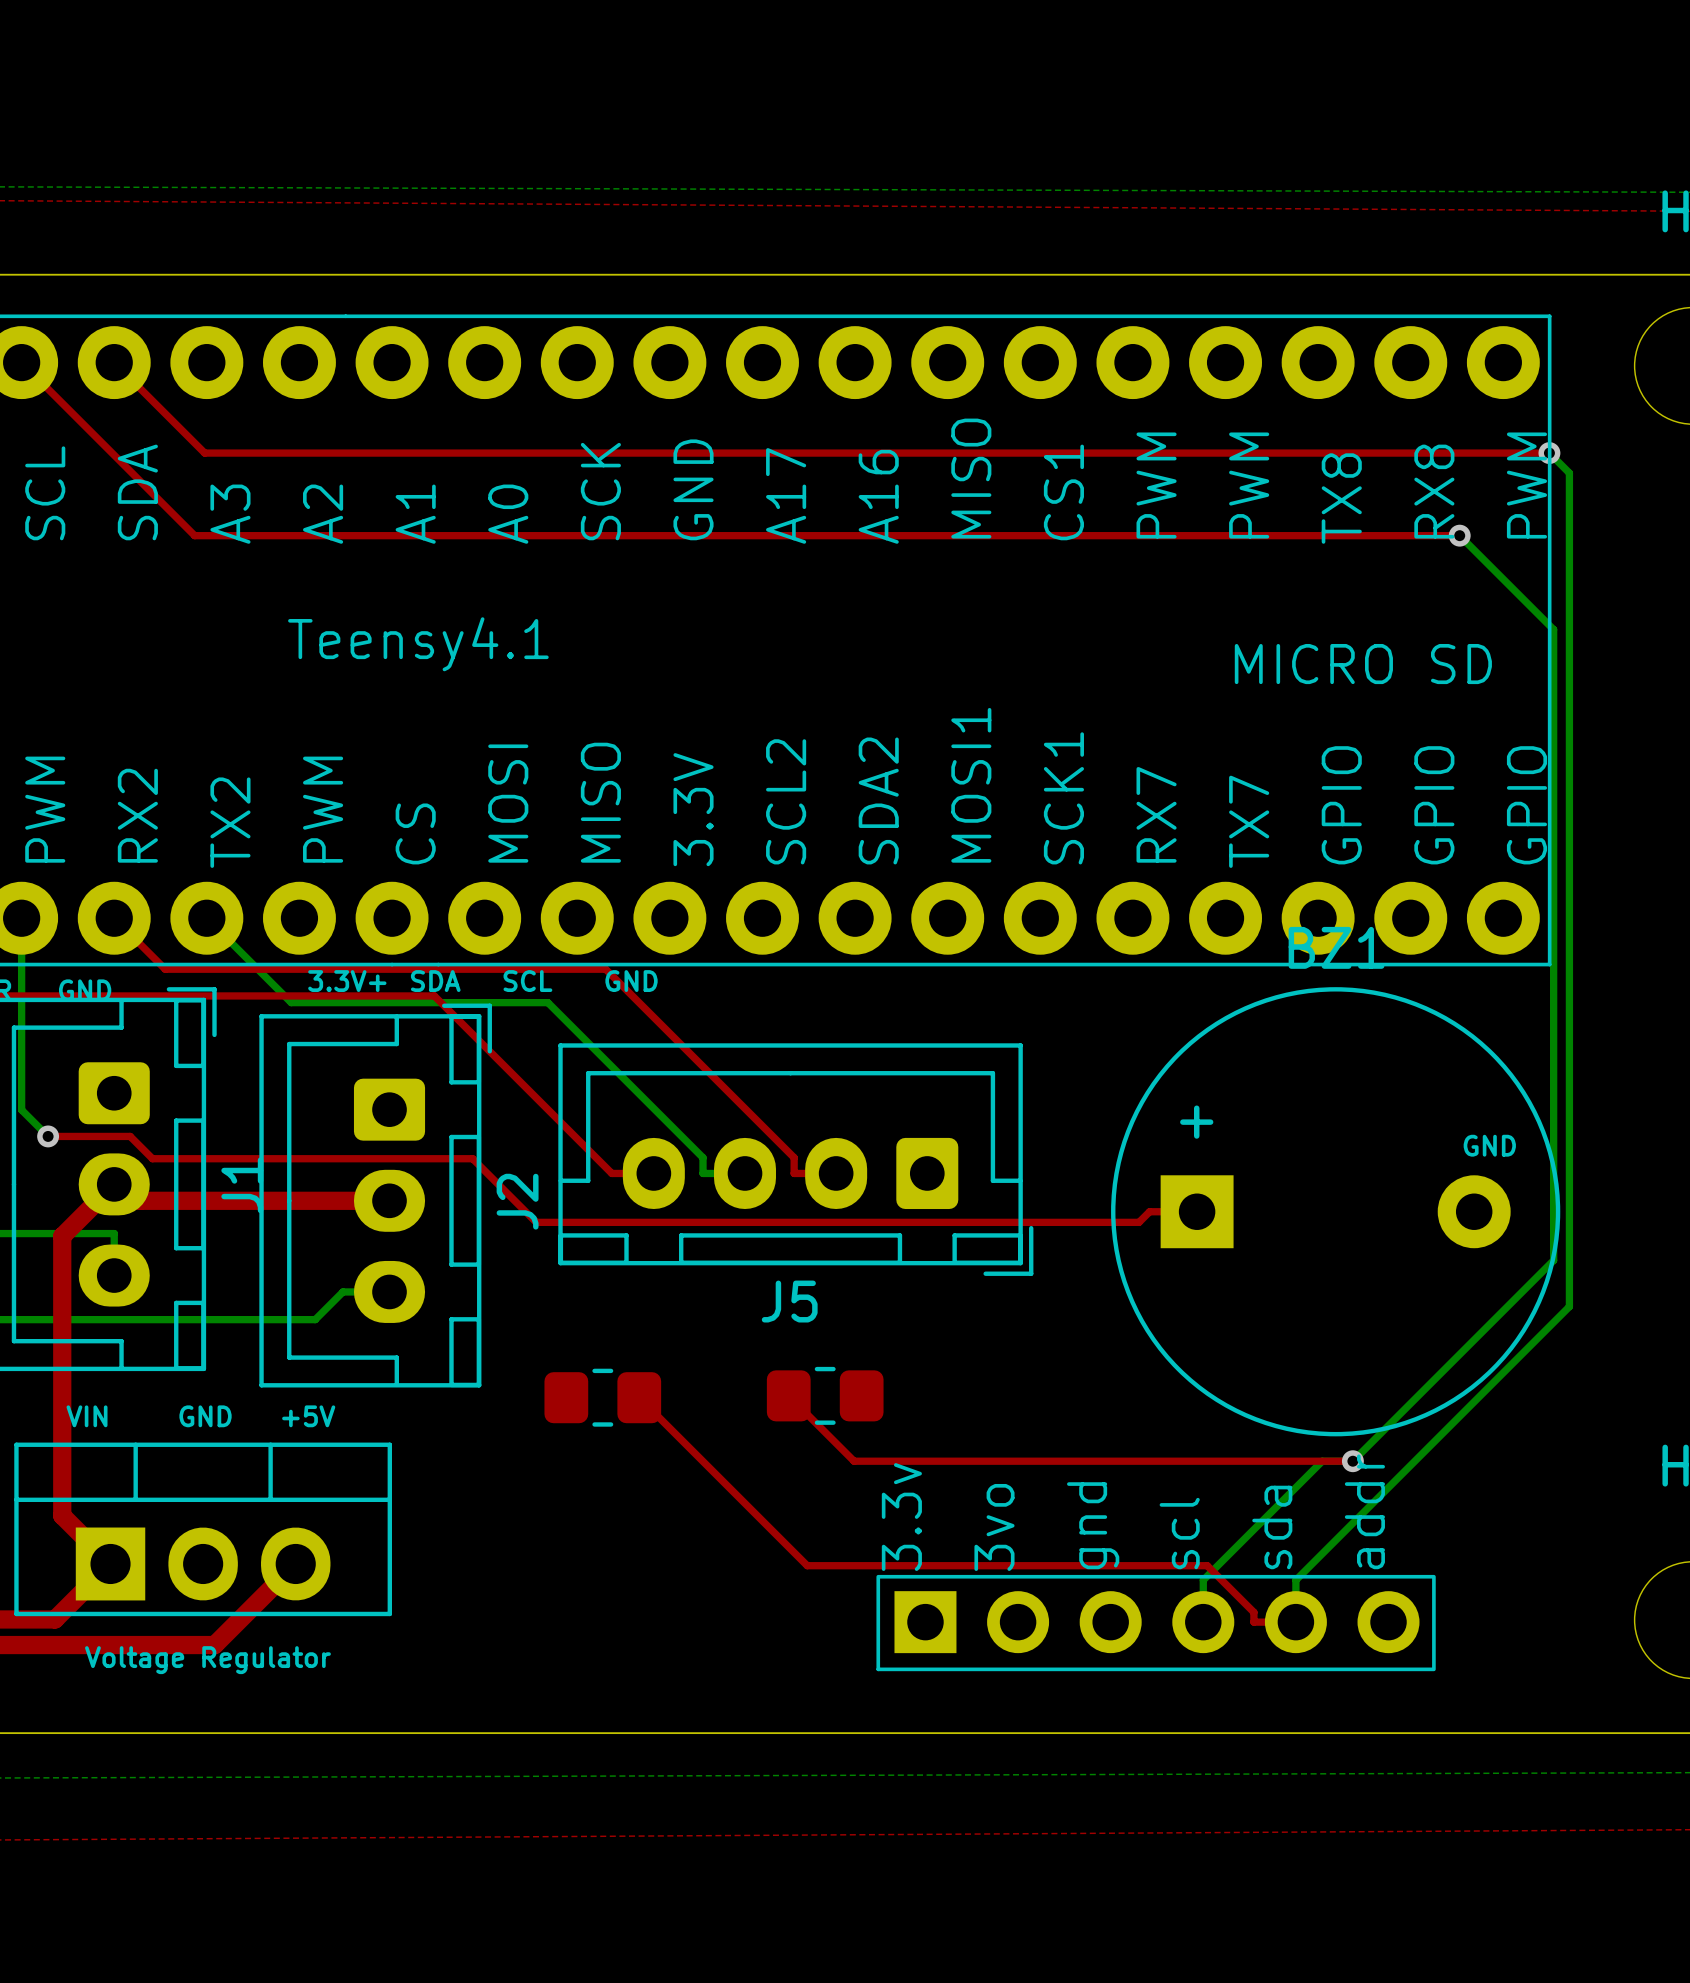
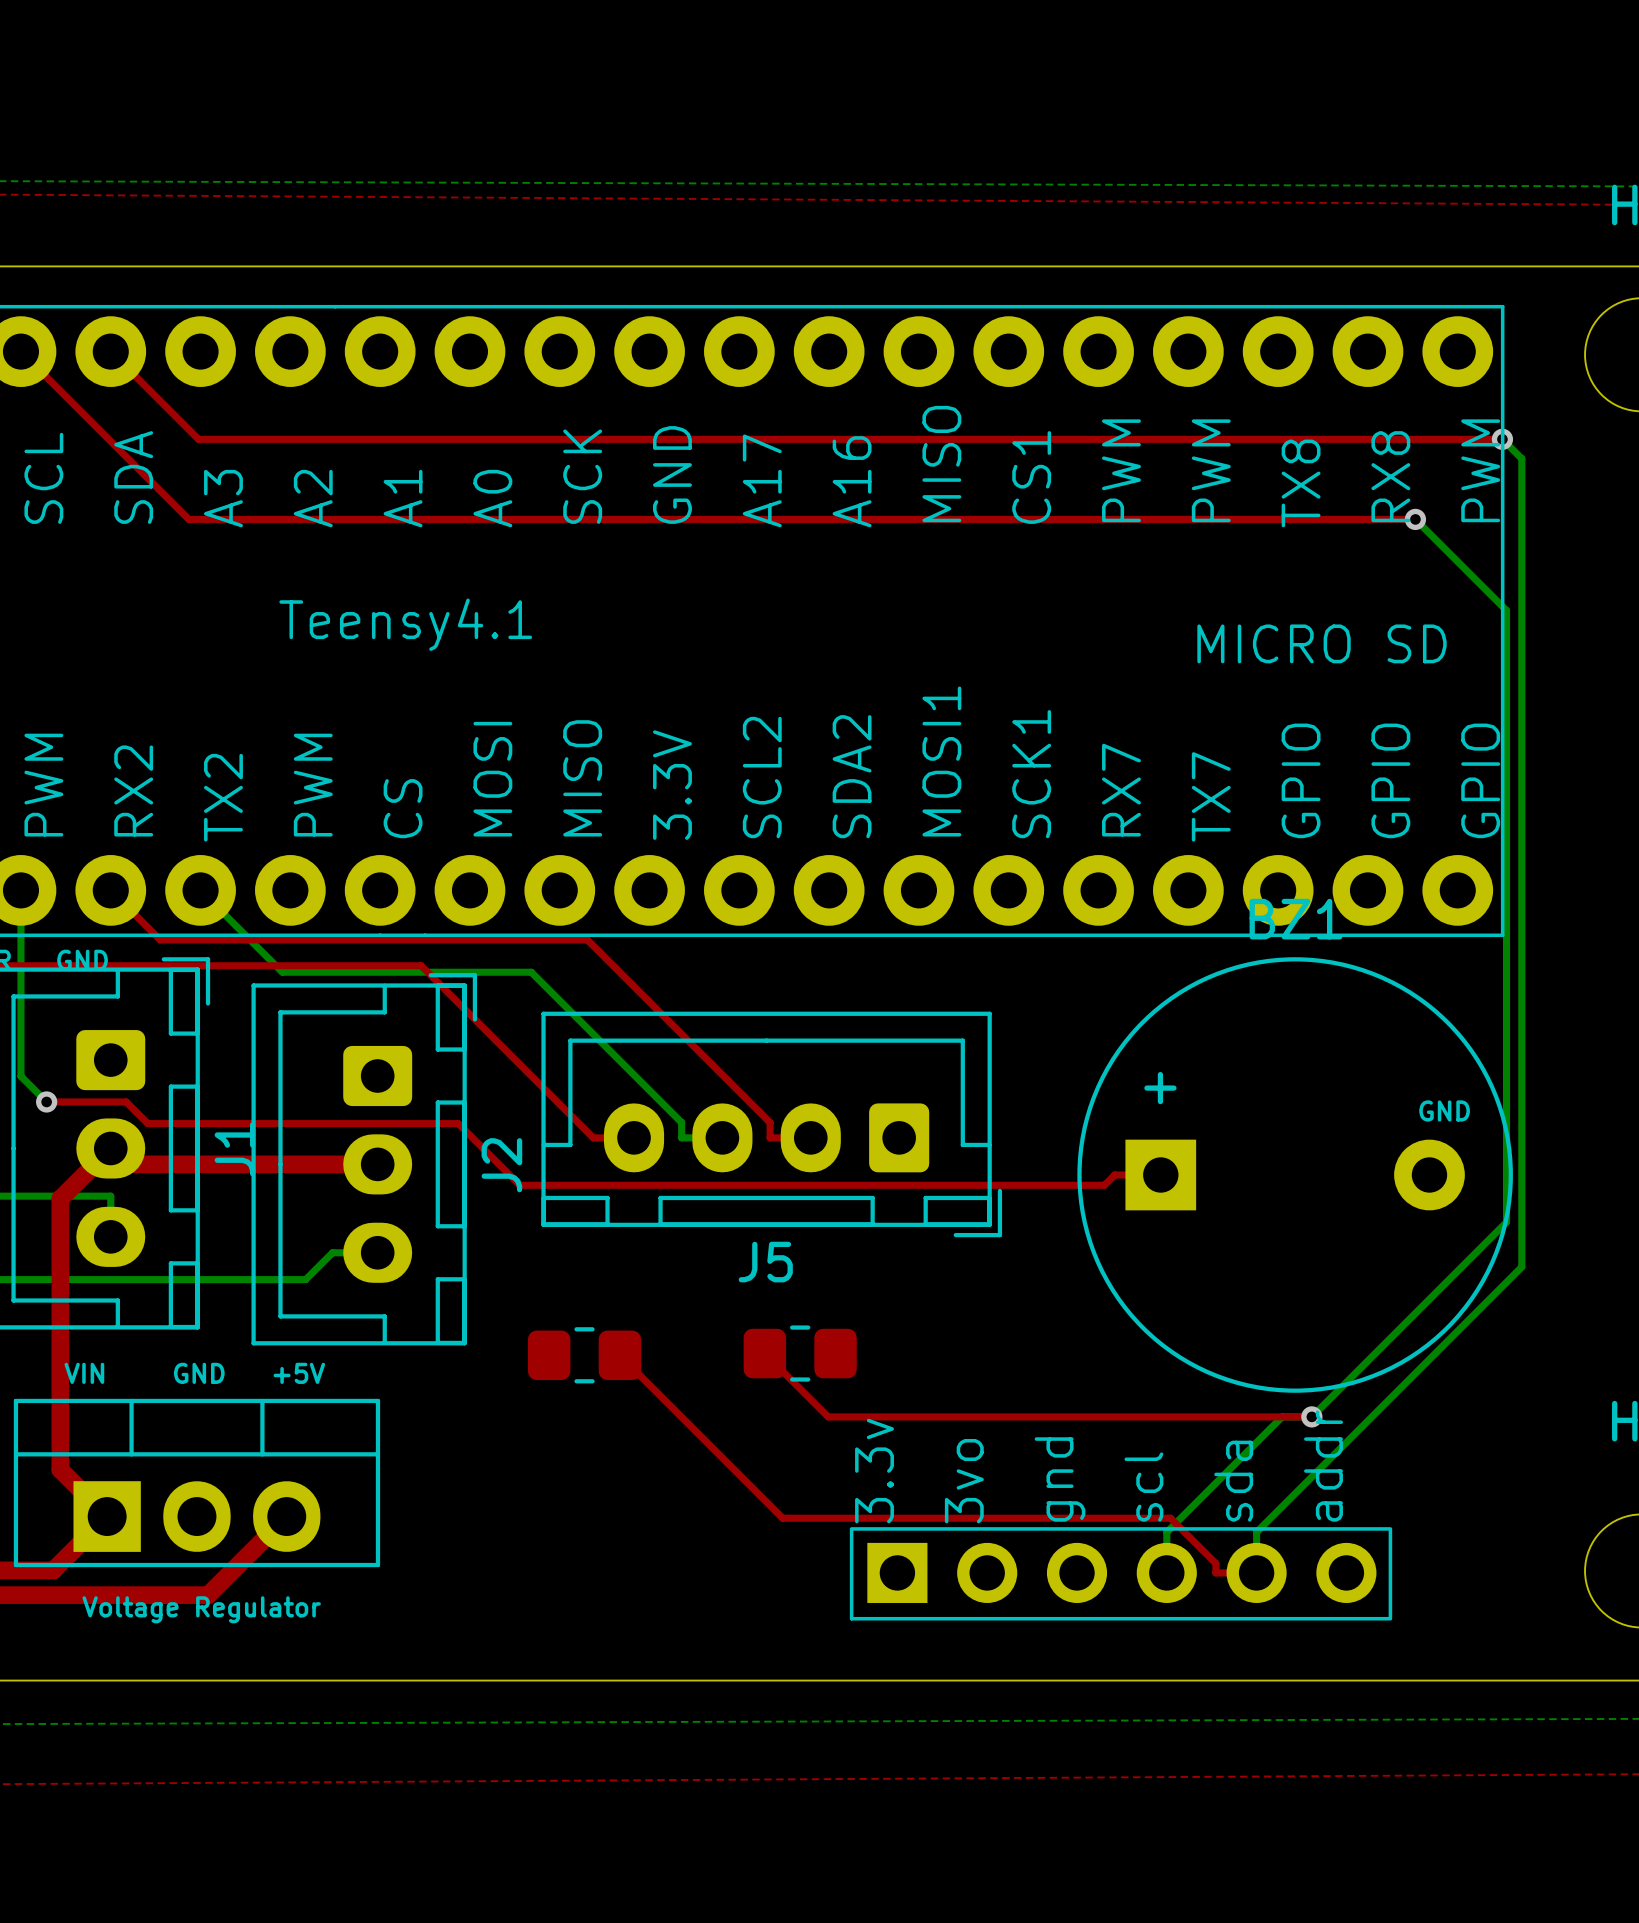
text: 3.3V+ (347, 981) -> none
text: SDA (435, 981) -> none
text: SCL (527, 981) -> none
text: GND (631, 981) -> none

